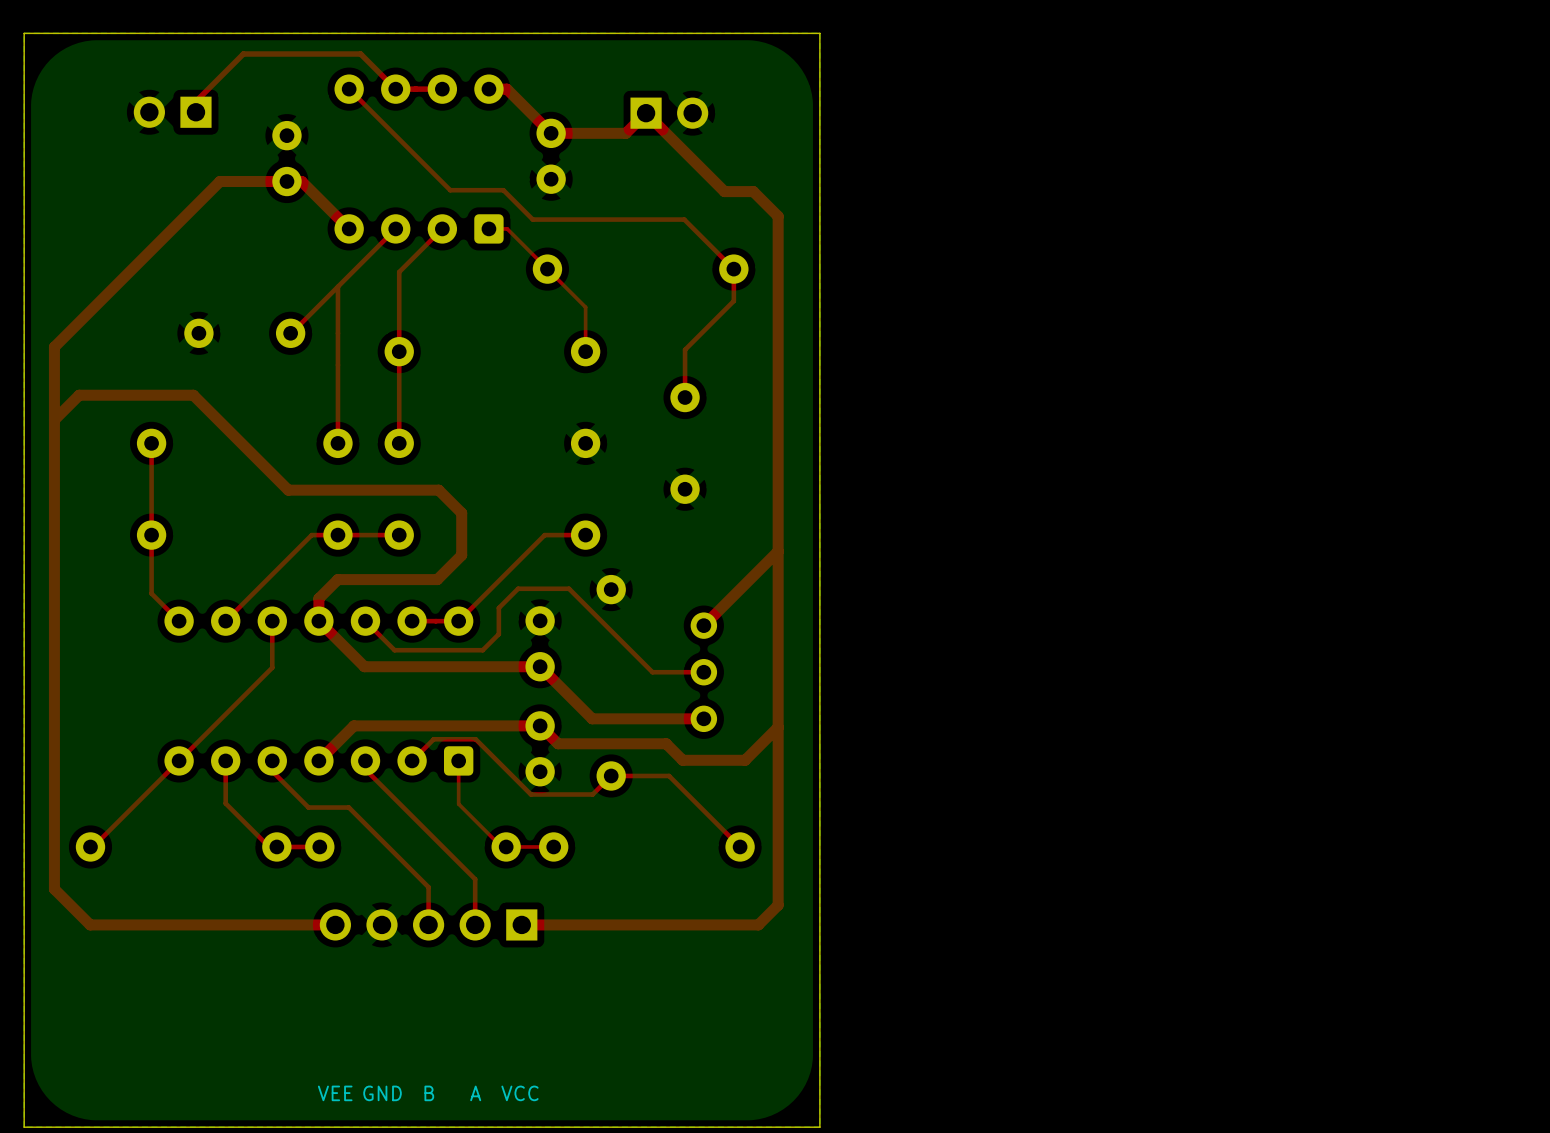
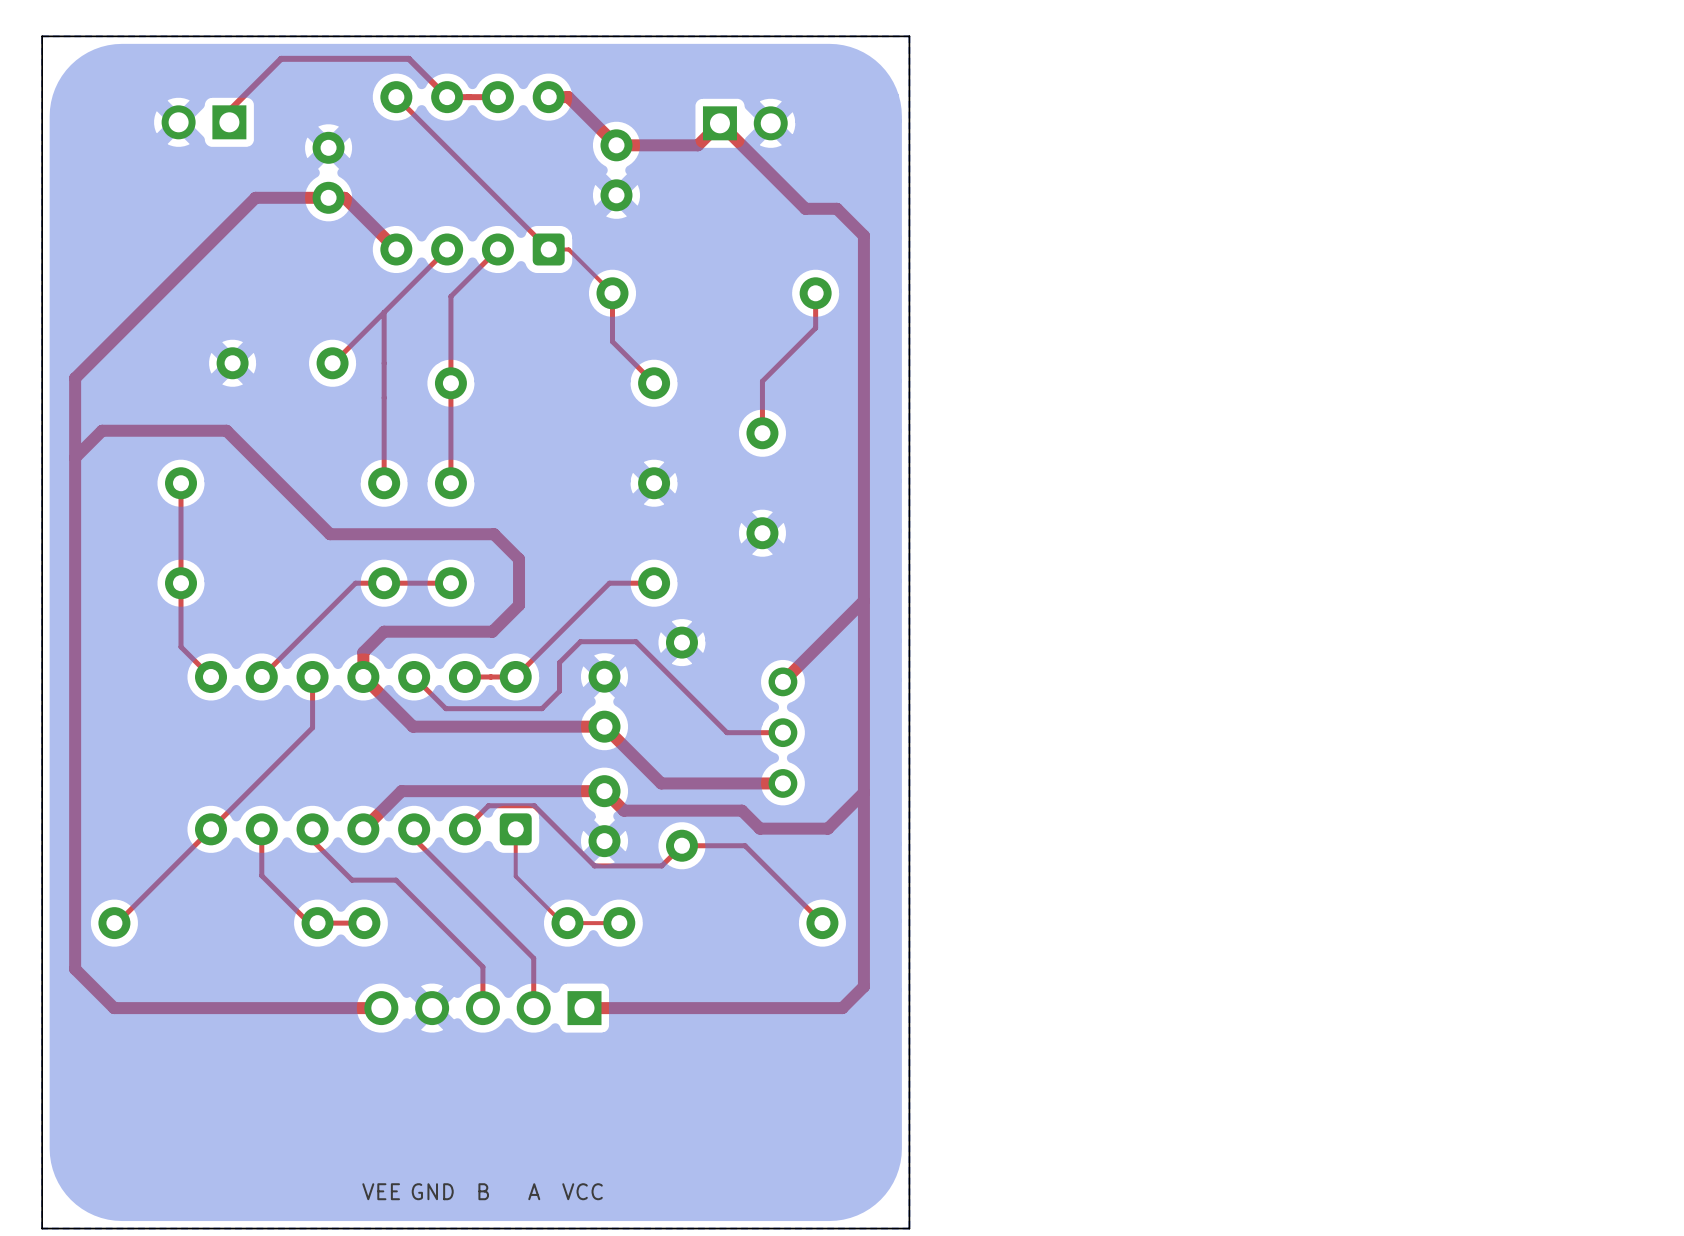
top track: (450, 190) (503, 190) (532, 219) (684, 219) (733, 269) -> (506, 207) (548, 249)
top track: (547, 269) (585, 307) (585, 351) -> (612, 293) (612, 341) (654, 383)

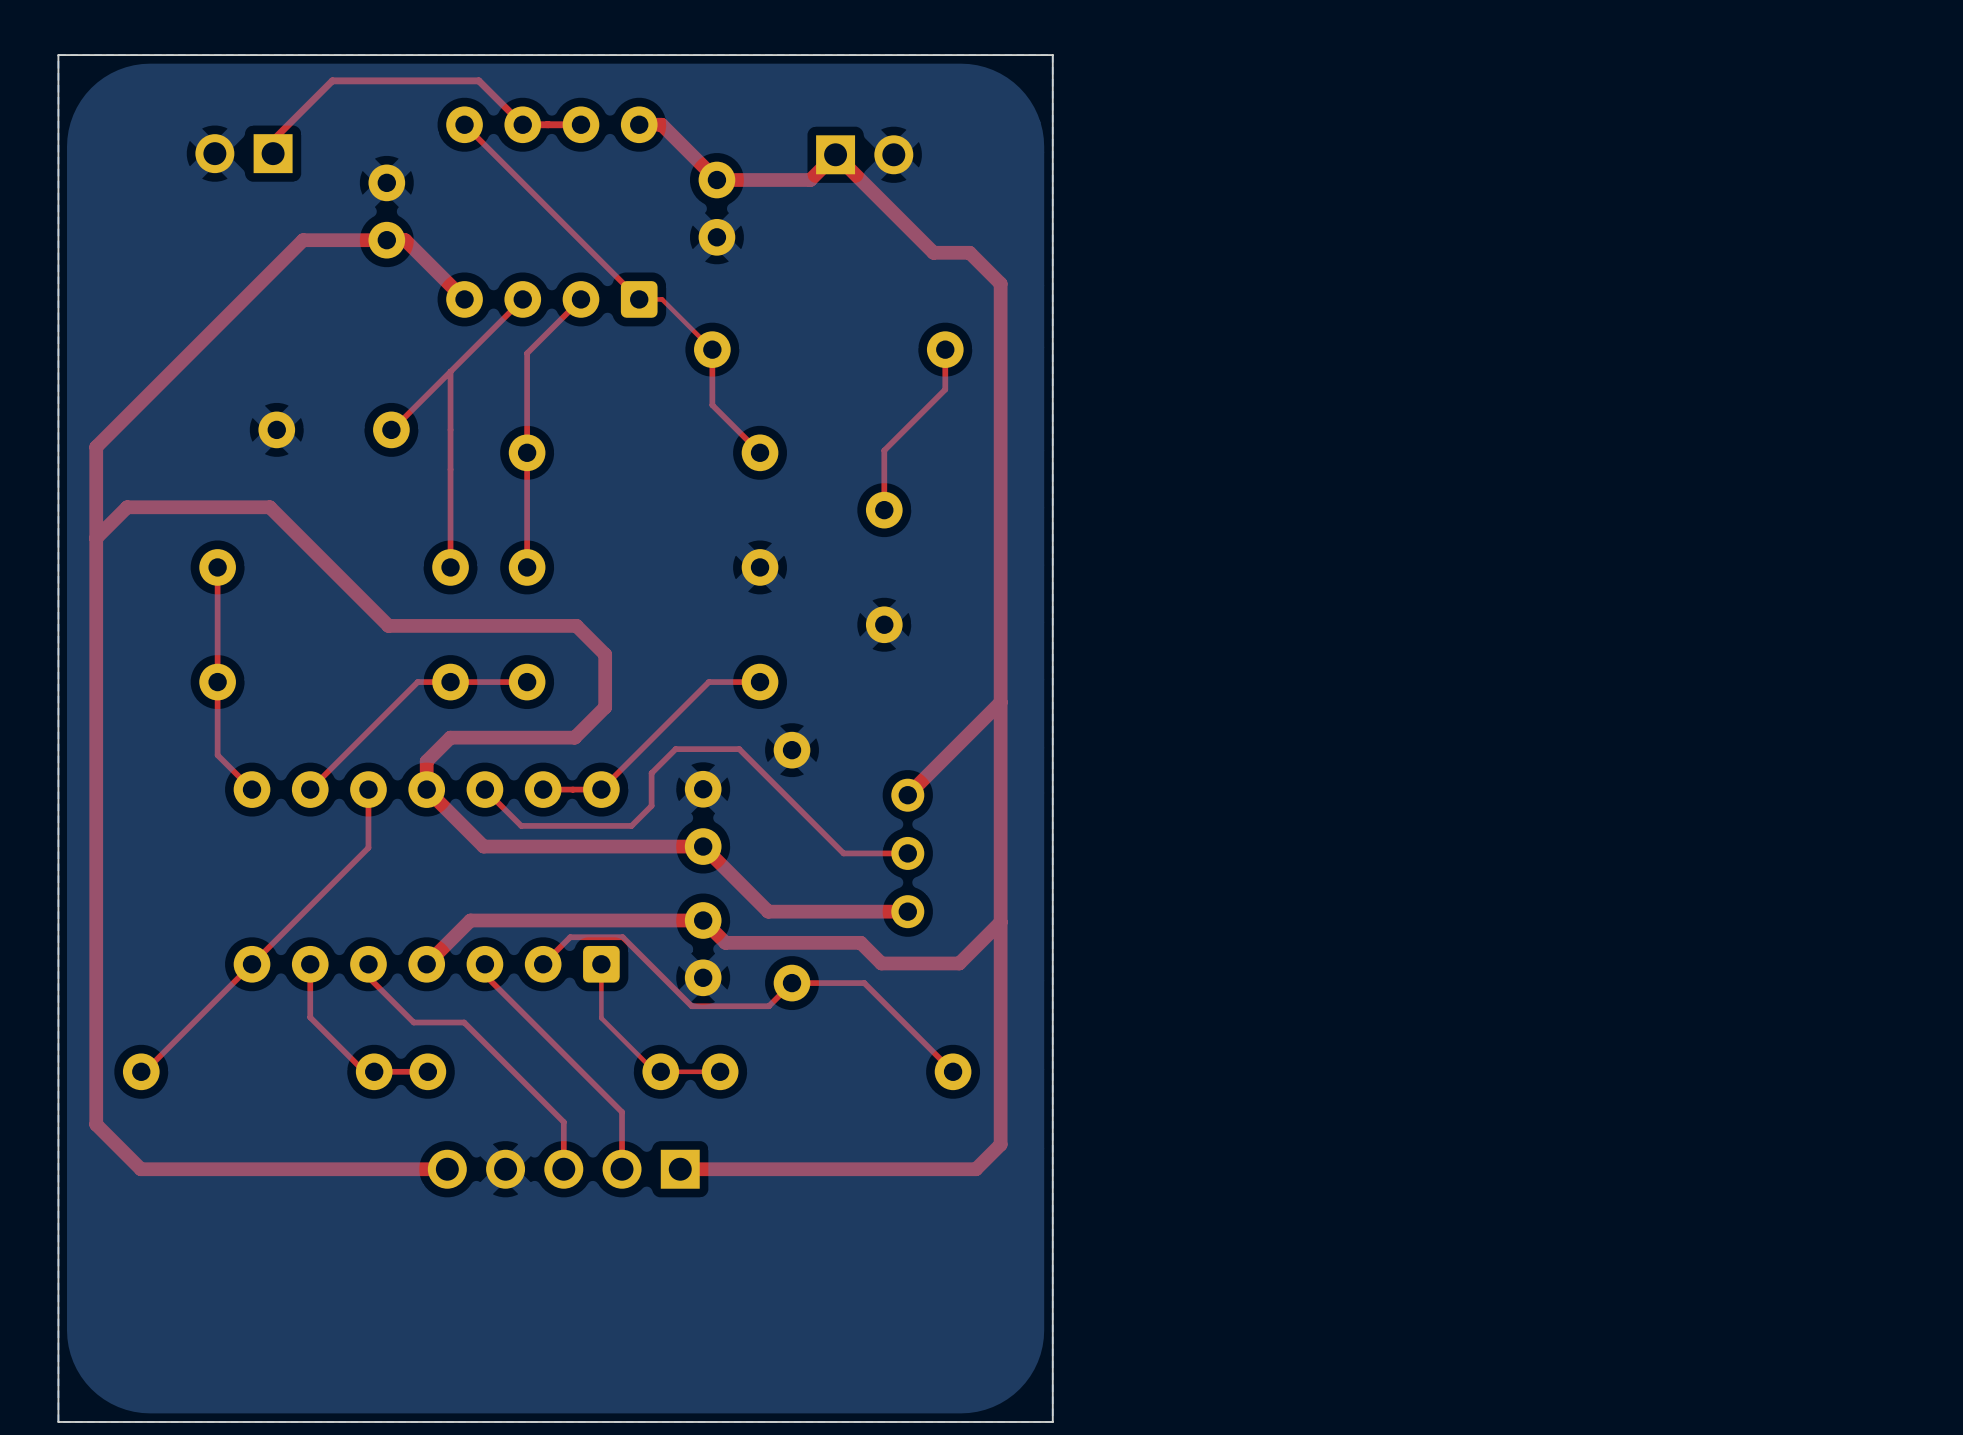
text: VEE (381, 1191) -> none
text: GND (432, 1191) -> none
text: B (483, 1191) -> none
text: A (534, 1191) -> none
text: VCC (582, 1191) -> none

